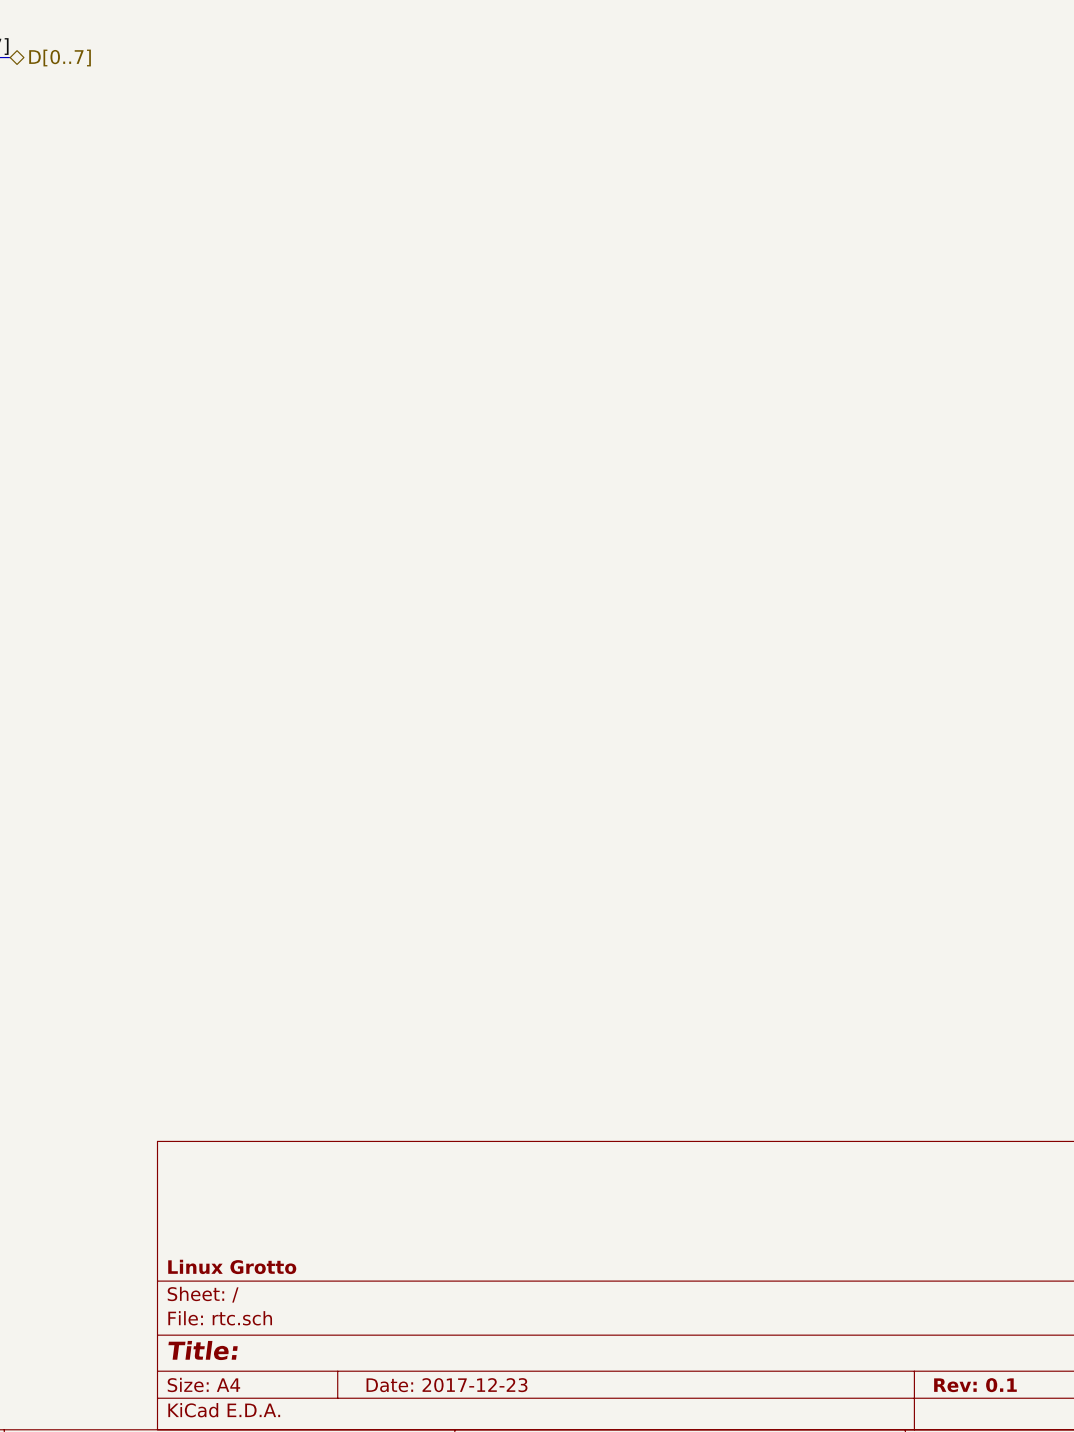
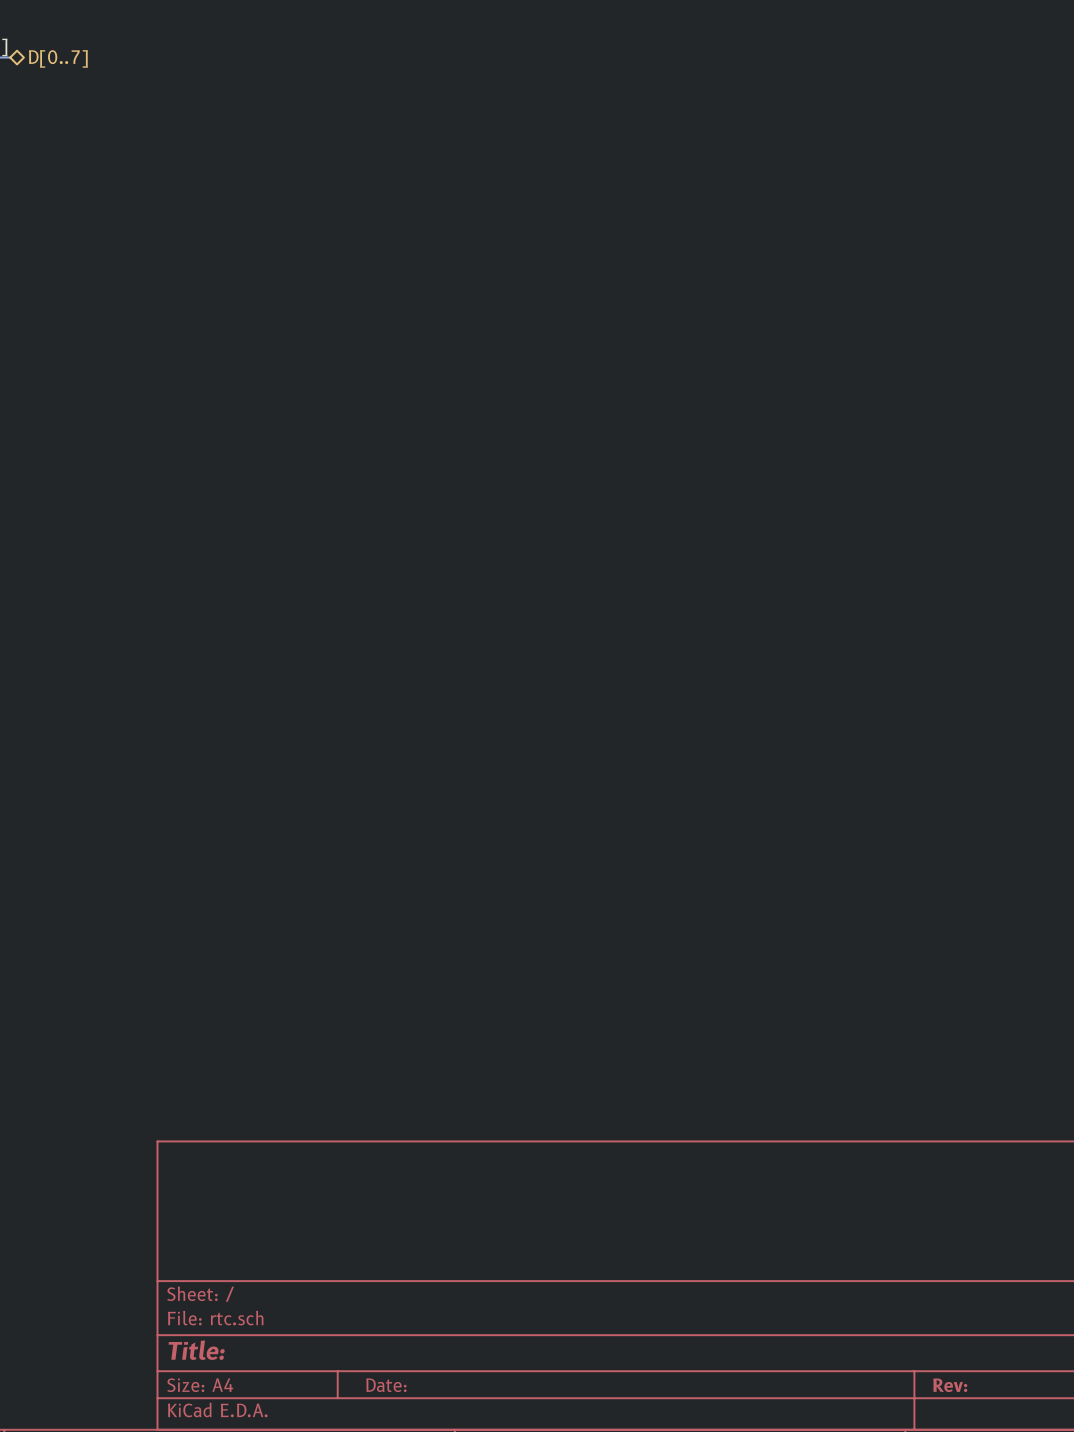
title block: Linux Grotto (232, 1266) -> none
title block: Date: 2017-12-23 (447, 1385) -> Date: (386, 1385)
title block: Rev: 0.1 (975, 1385) -> Rev: (950, 1385)

